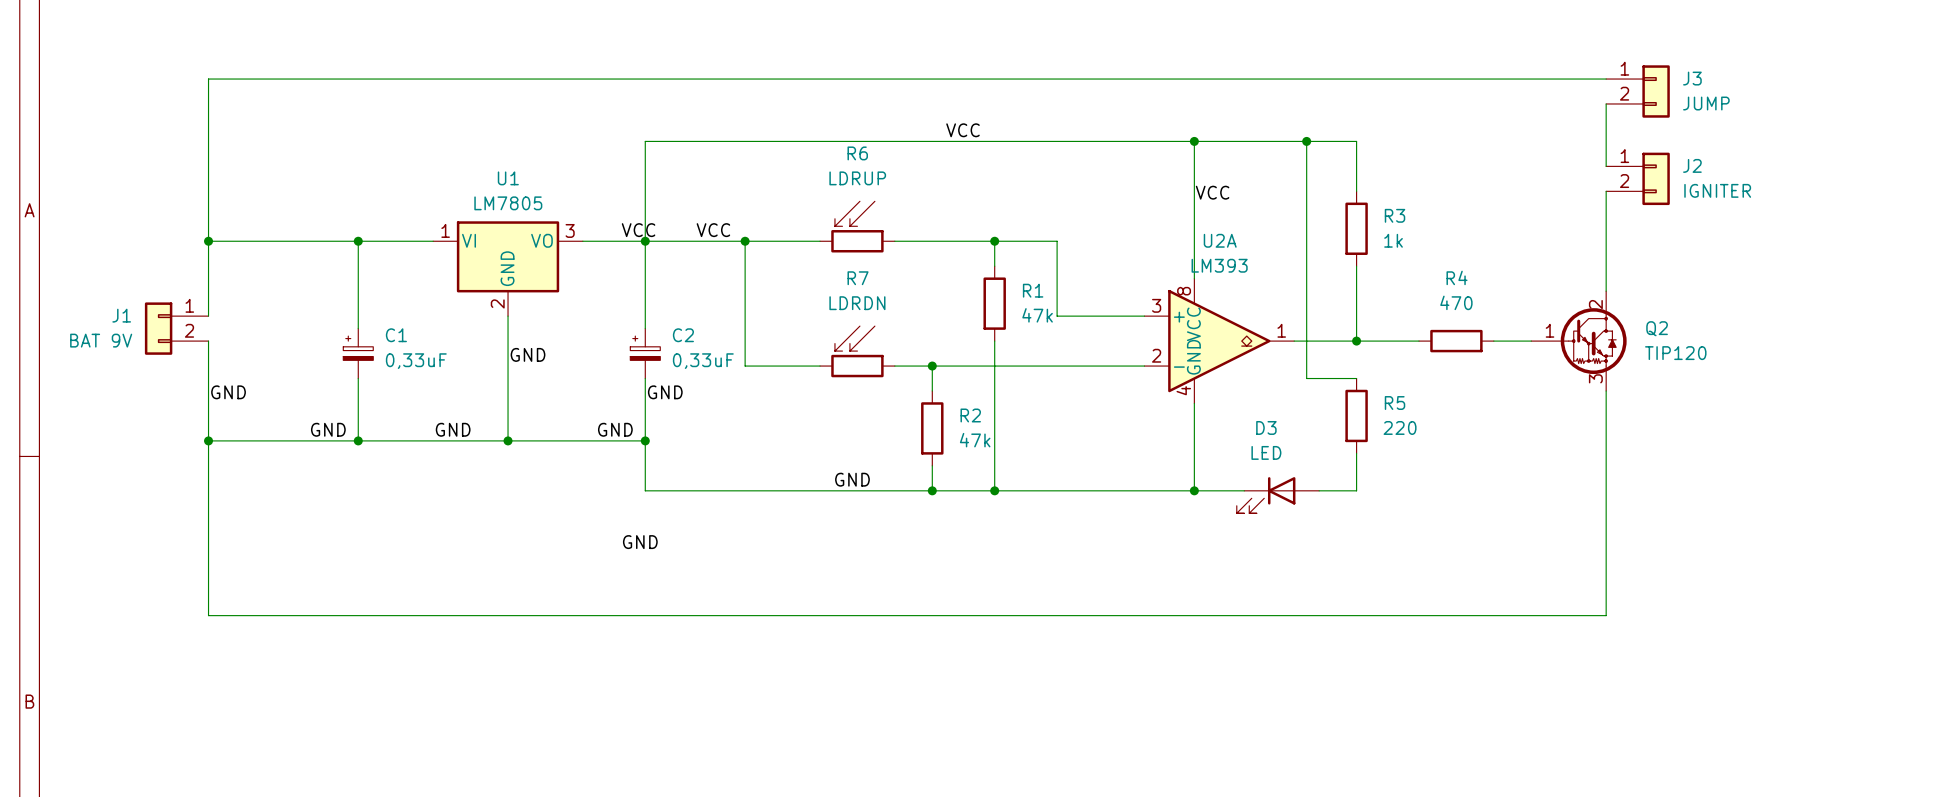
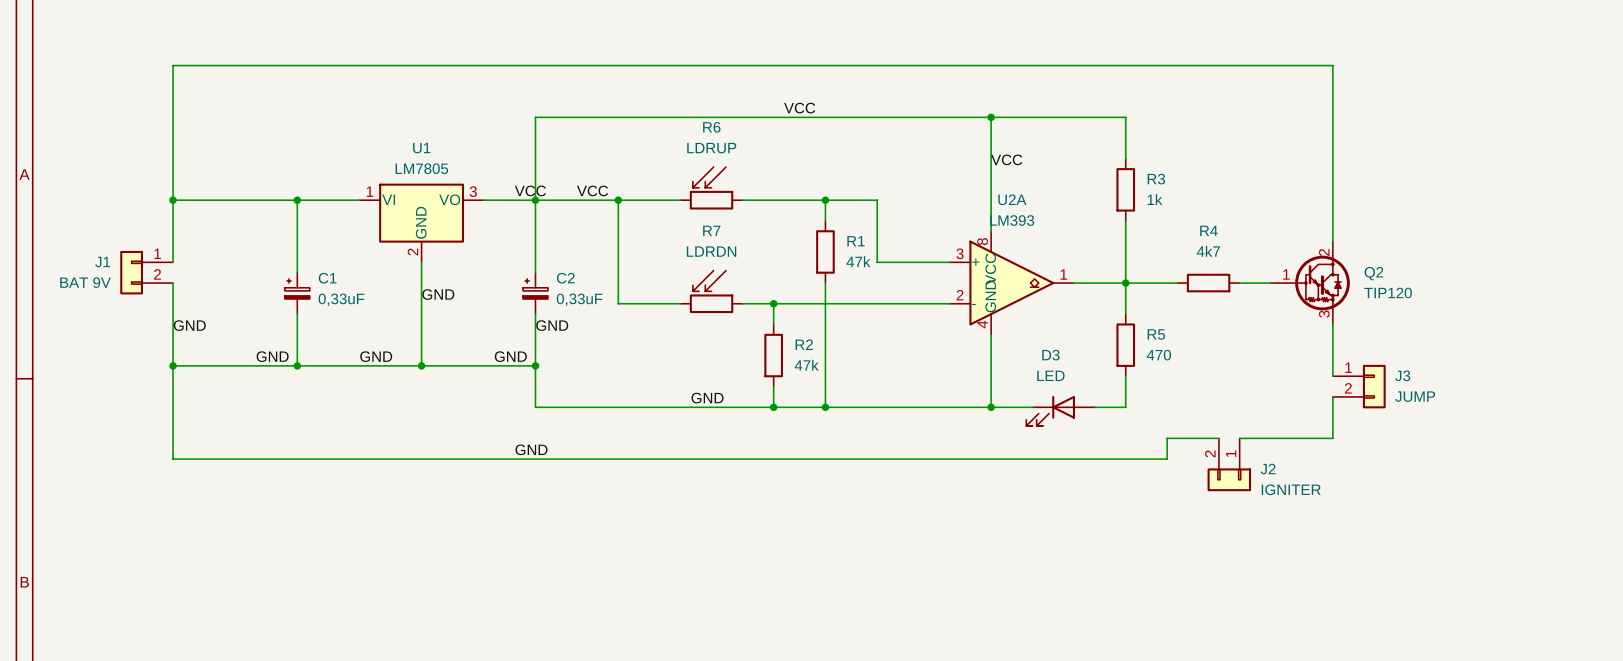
wire: none -> (1332, 65) (1332, 86)
J3 position: (1637, 91) -> (1359, 386)
wire: (1306, 141) (1306, 378) (1356, 378) -> (1125, 283) (1125, 314)
junction: (1306, 141) -> none
wire: none -> (1332, 138) (1332, 158)
J2 position: (1637, 178) -> (1229, 464)
J2 rotation: 0° (1656, 178) -> 90° clockwise (1229, 479)
R4 value: 470 (1456, 302) -> 4k7 (1208, 251)
R5 value: 220 (1400, 427) -> 470 (1158, 355)
wire: (1606, 453) (1606, 478) -> none
wire: none -> (1239, 438) (1332, 438)
wire: (1606, 528) (1606, 615) (208, 615) (208, 553) -> (1218, 438) (1167, 438) (1167, 459) (173, 459)

